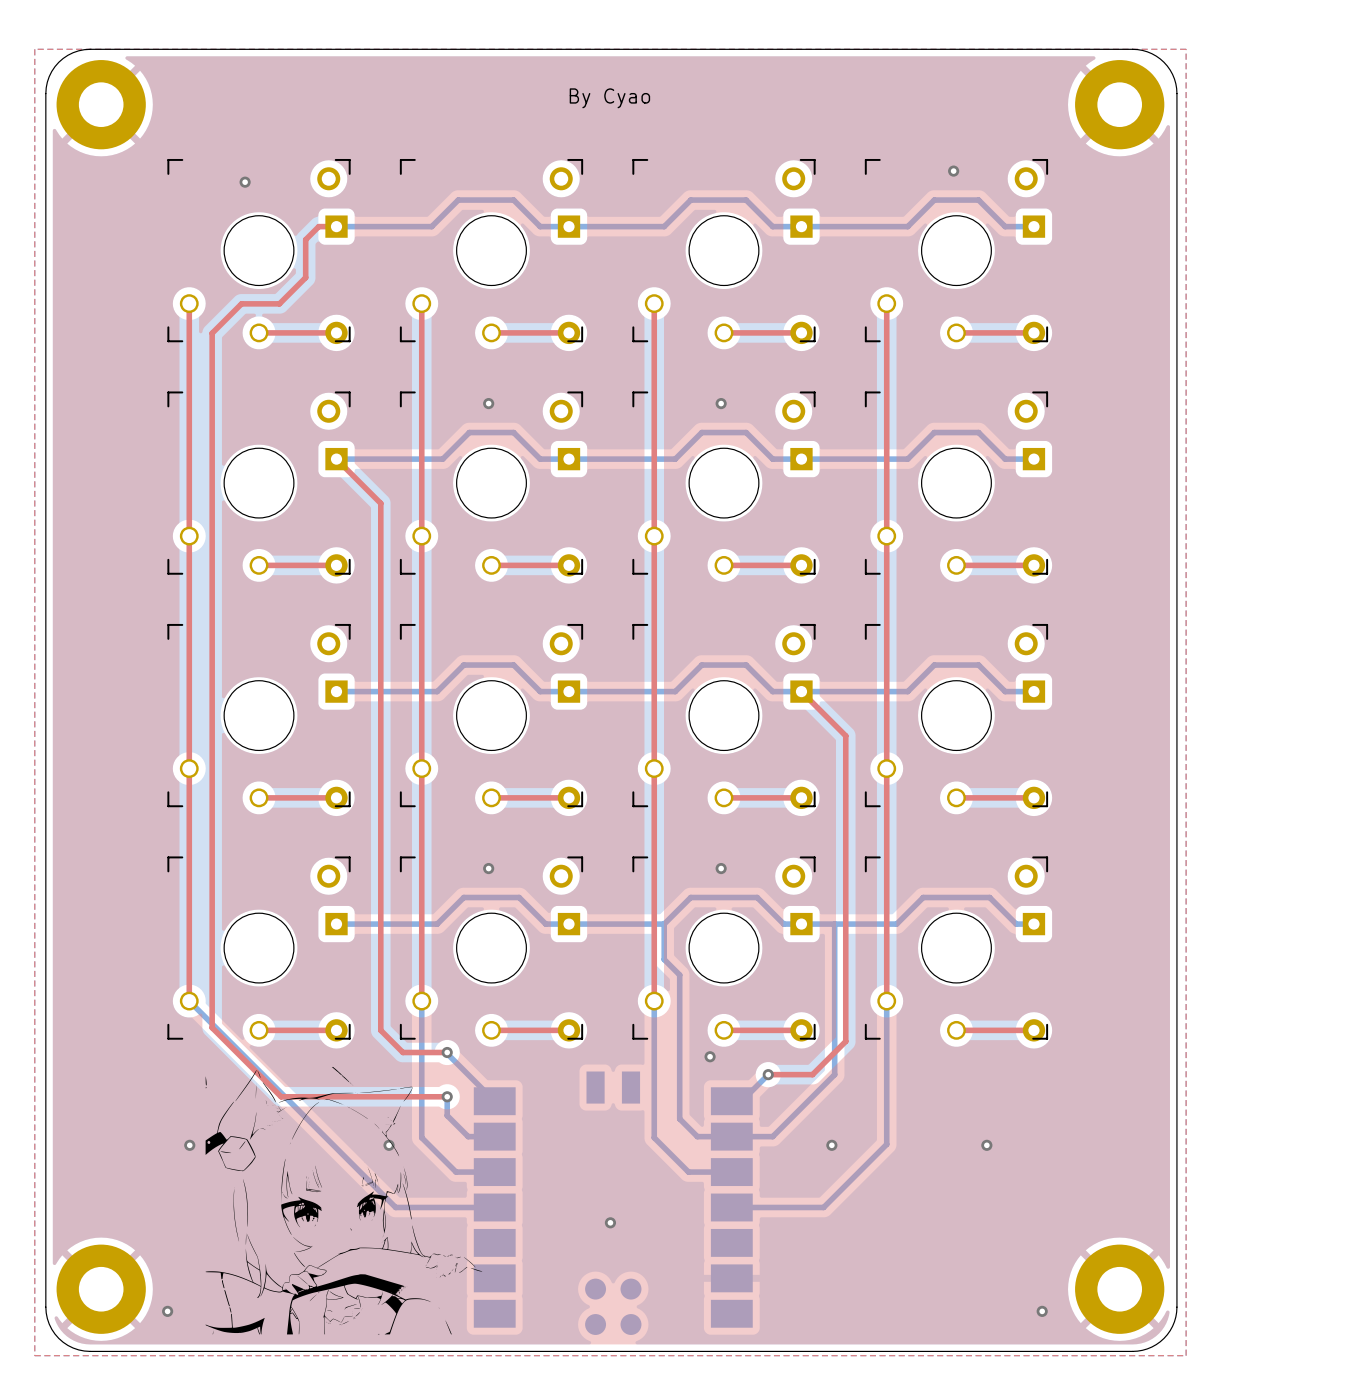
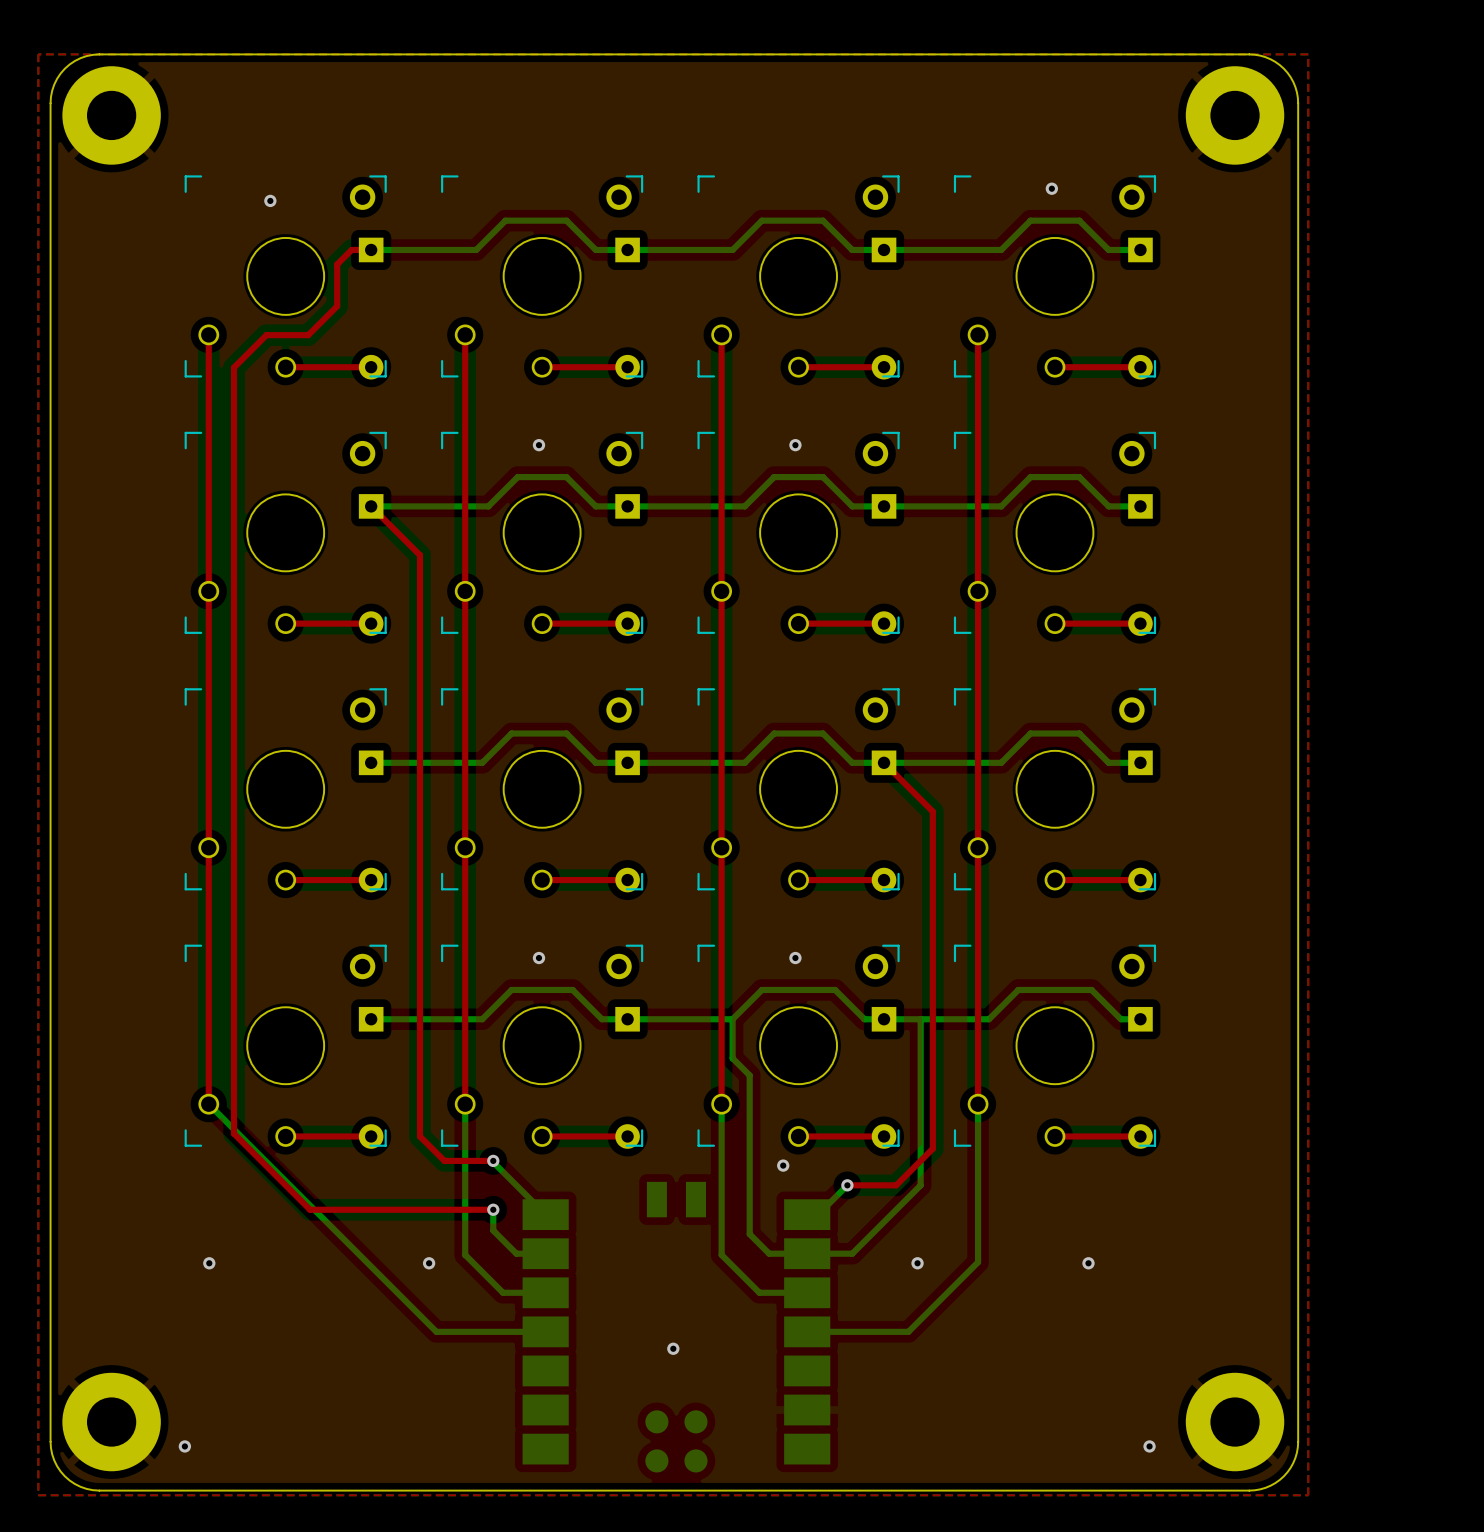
text: By Cyao (609, 98) -> none
drawing: [205, 1066, 483, 1335] -> none

